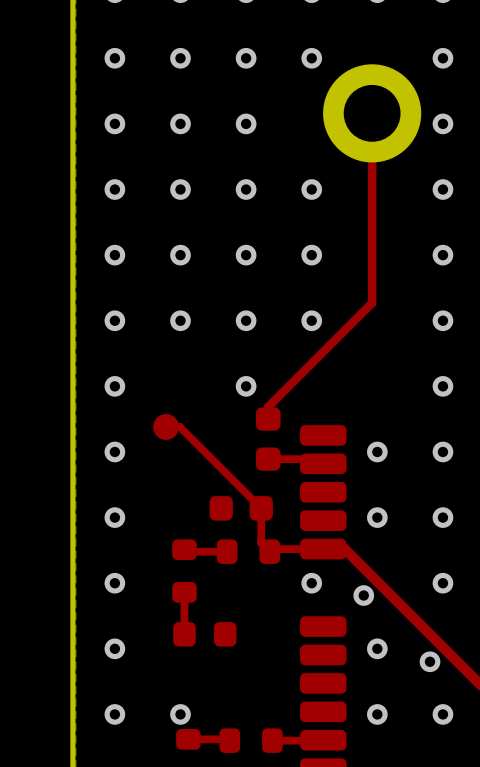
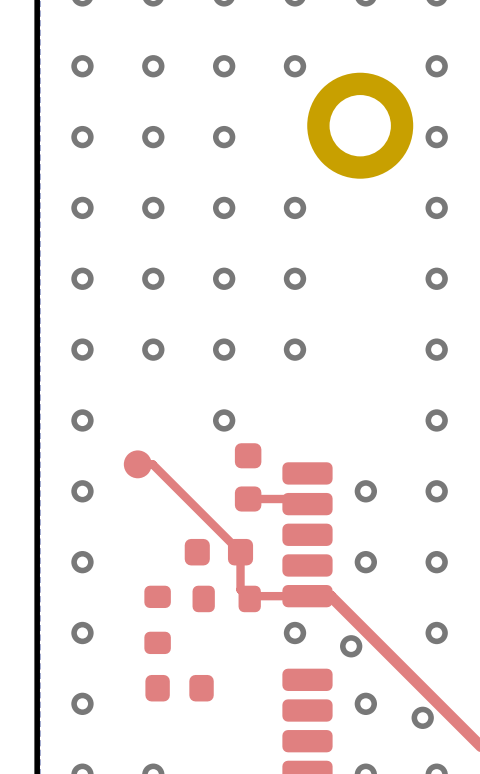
top track: (372, 113) (372, 302) (268, 406) (268, 419) -> none
top track: (184, 549) (186, 551) (227, 551) -> none
top track: (184, 592) (184, 634) -> none

